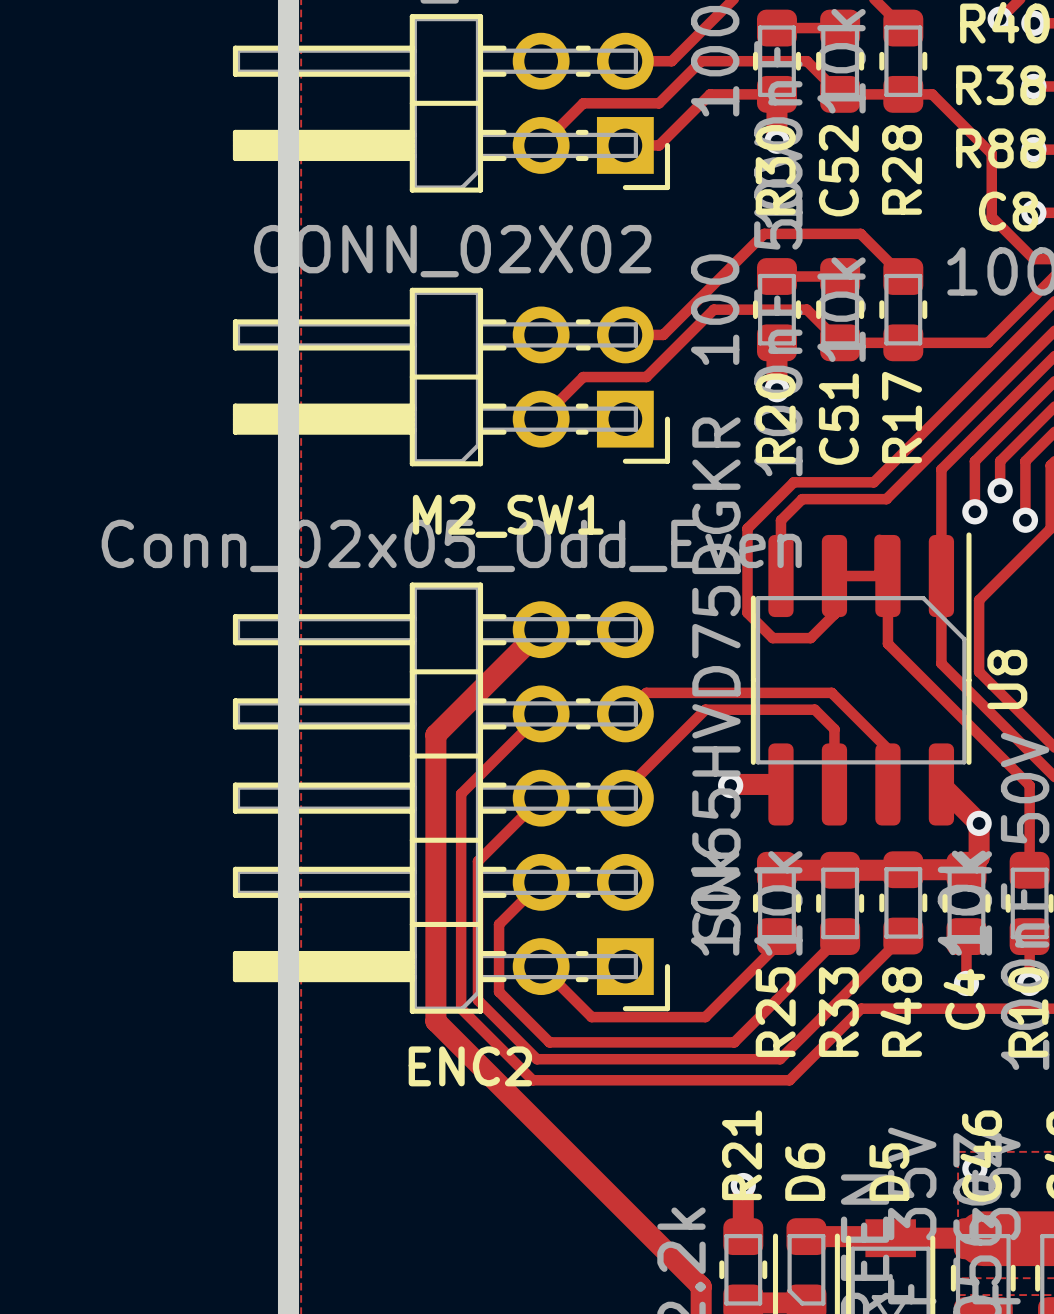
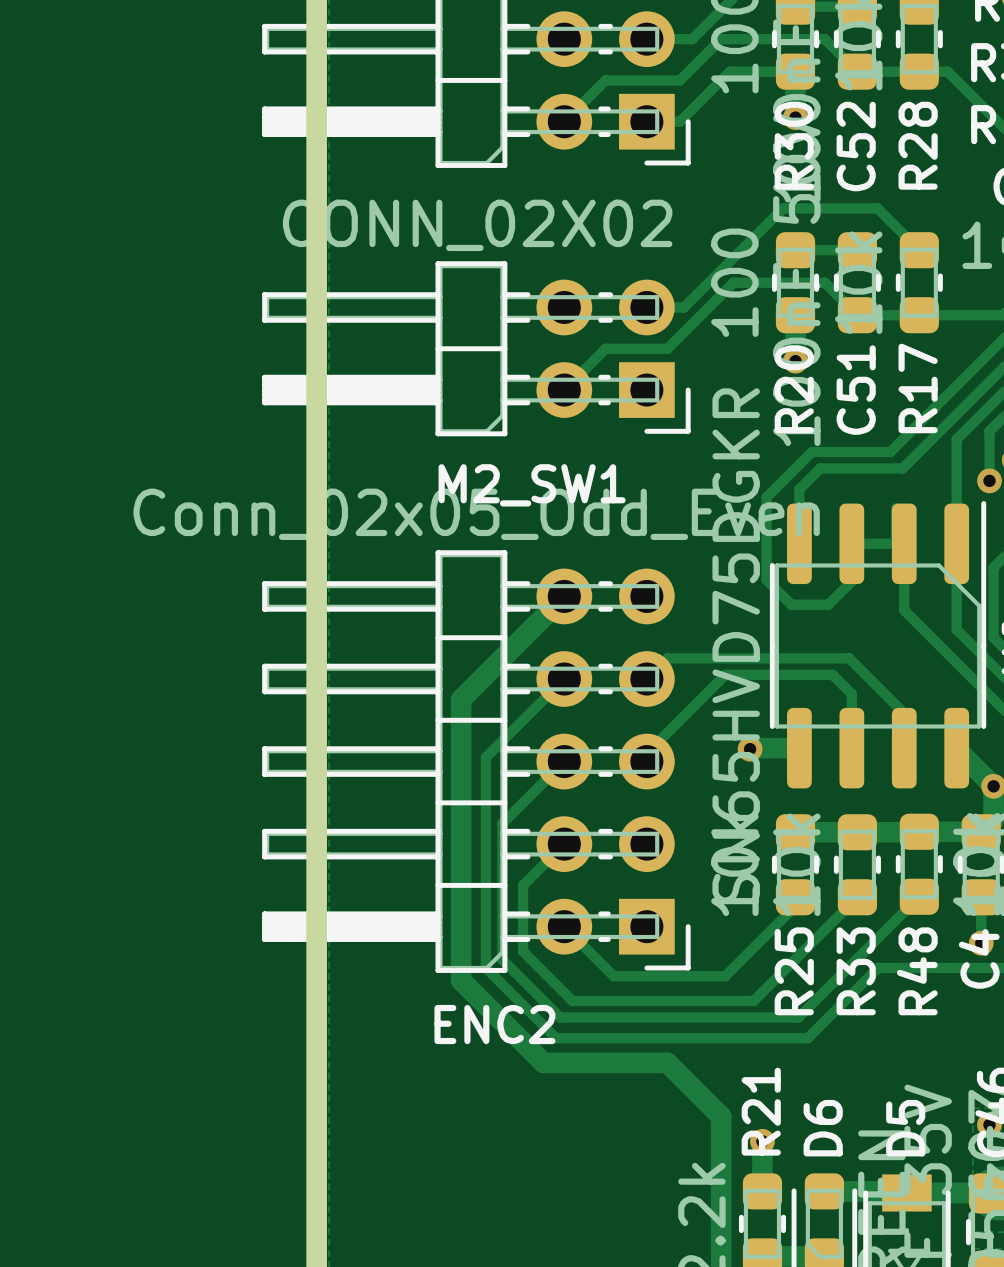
track: (520, 1105) (701, 1286) -> (543, 1062) (667, 1062) (721, 1116) (721, 1240)

